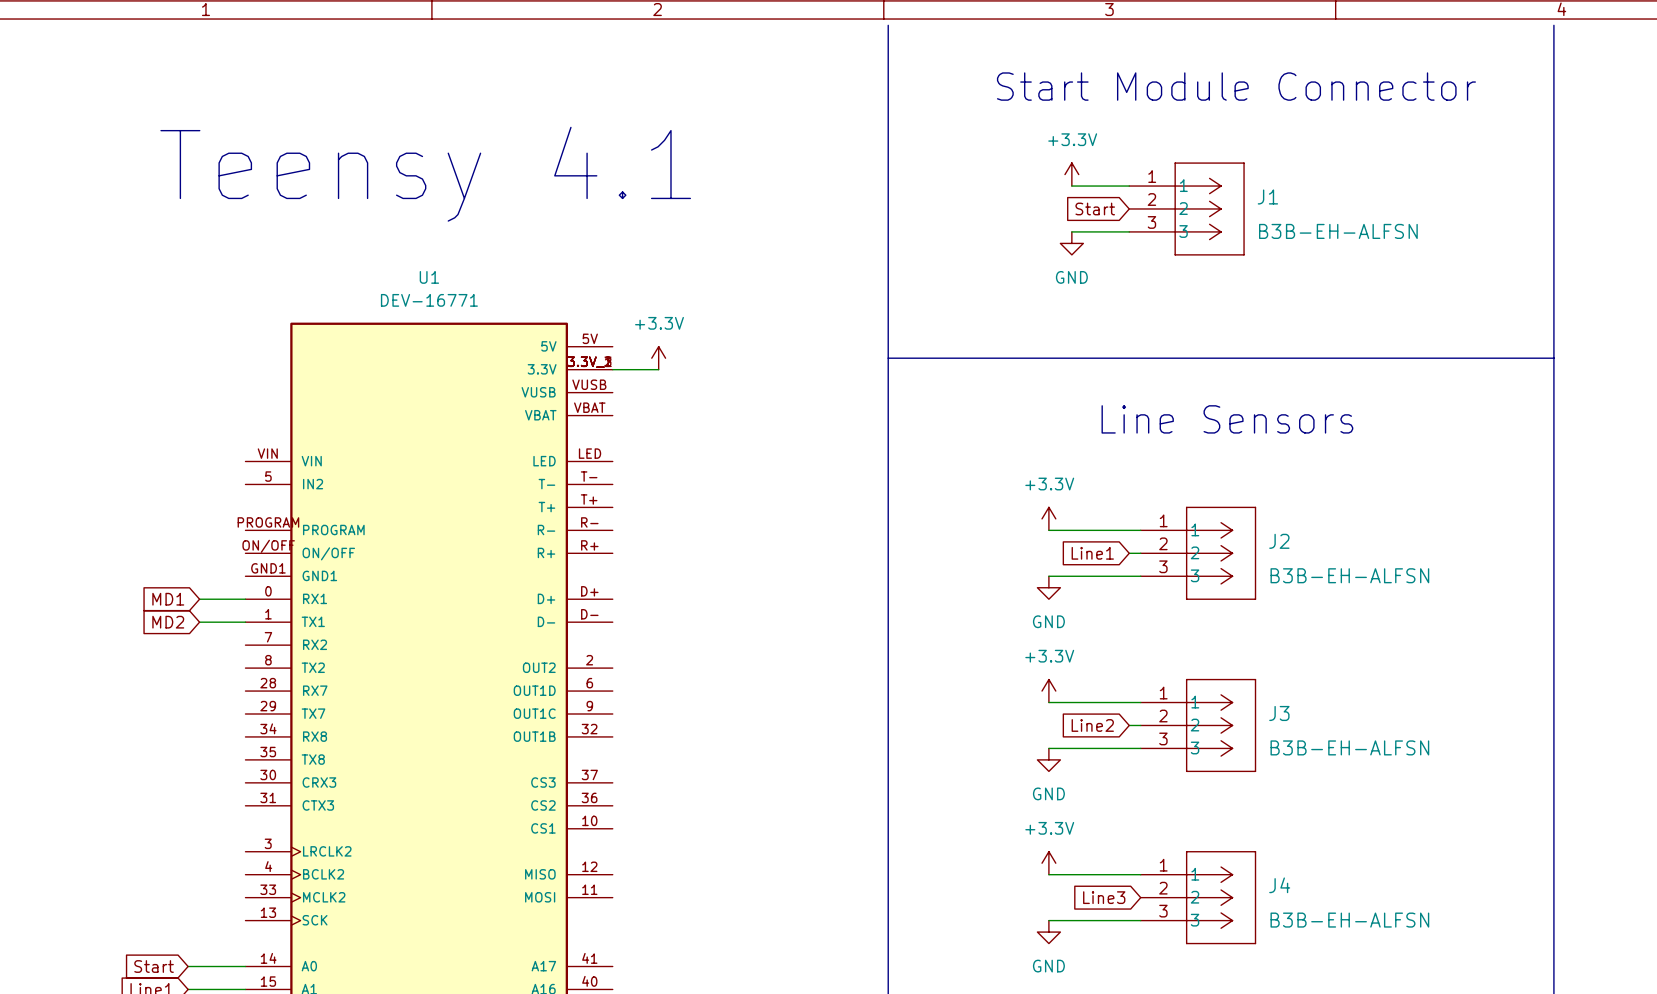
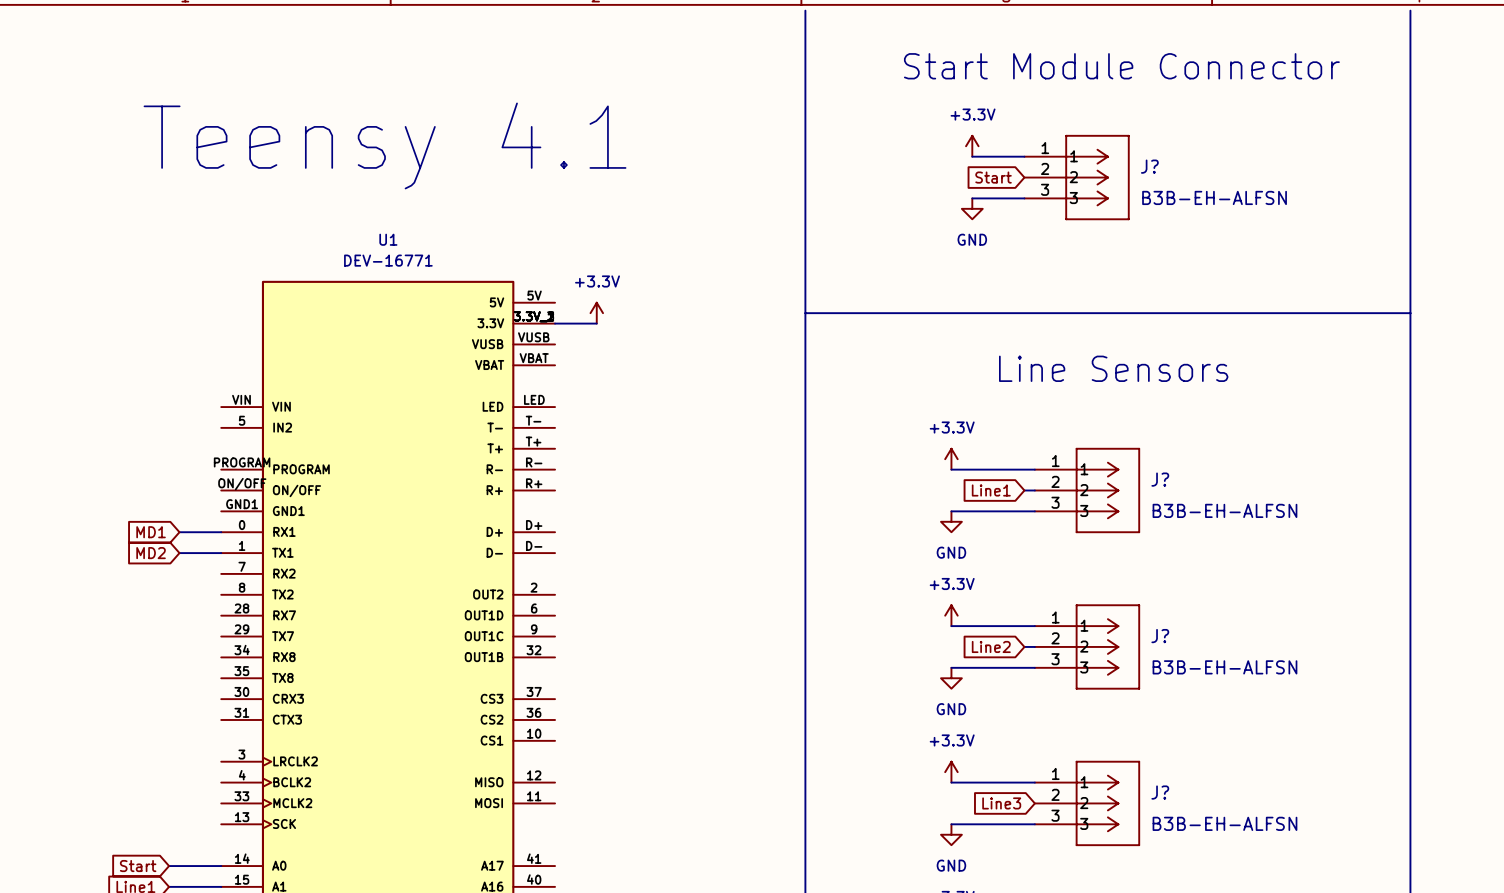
J1 name: J1 (1267, 196) -> J? (1149, 166)
J2 name: J2 (1279, 541) -> J? (1160, 479)
J3 name: J3 (1279, 713) -> J? (1160, 636)
J4 name: J4 (1279, 885) -> J? (1160, 792)

